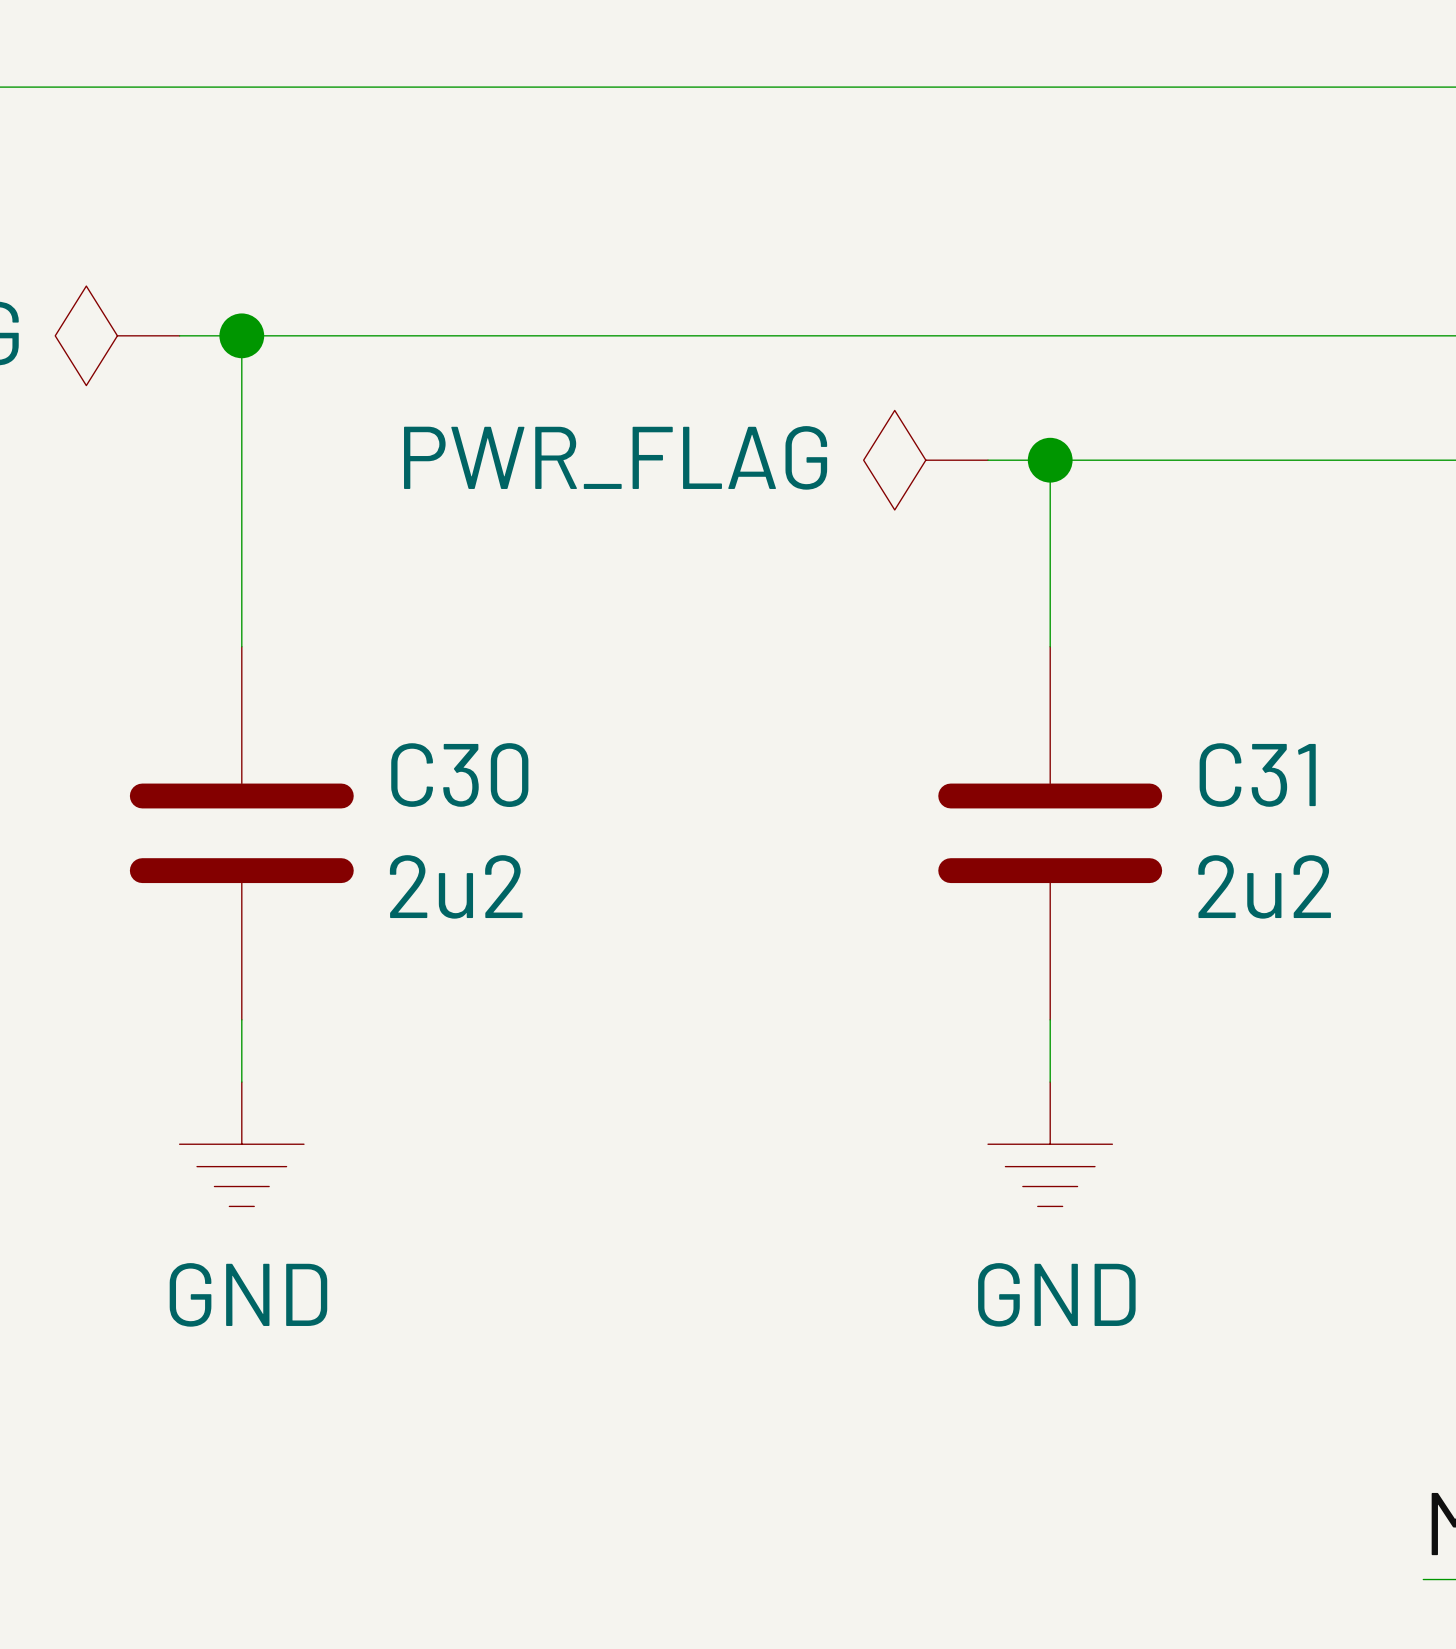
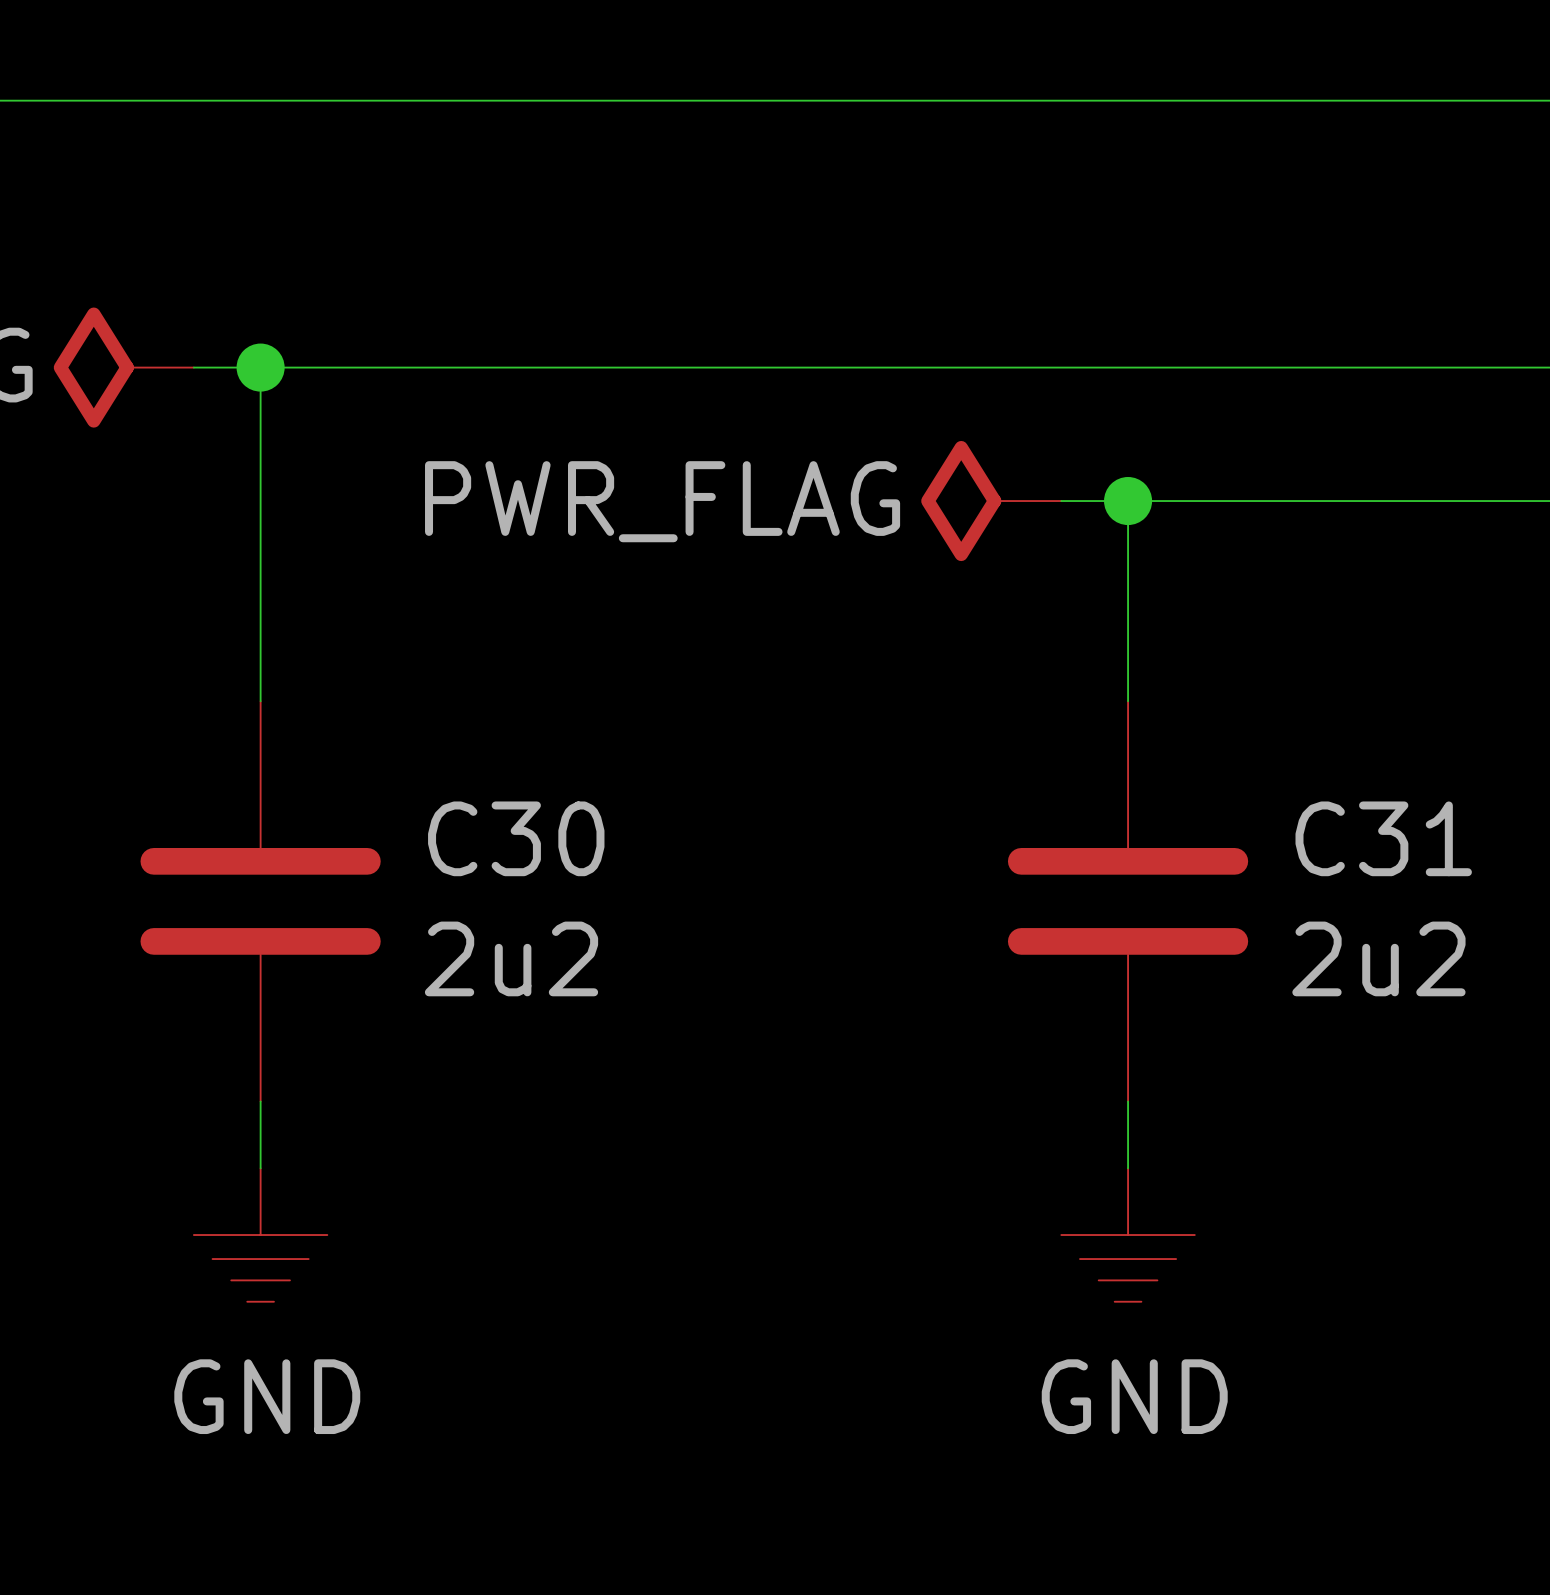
power symbol shape: [55, 286, 180, 386] -> [53, 307, 194, 428]
power symbol shape: [863, 410, 989, 510] -> [921, 440, 1062, 562]

